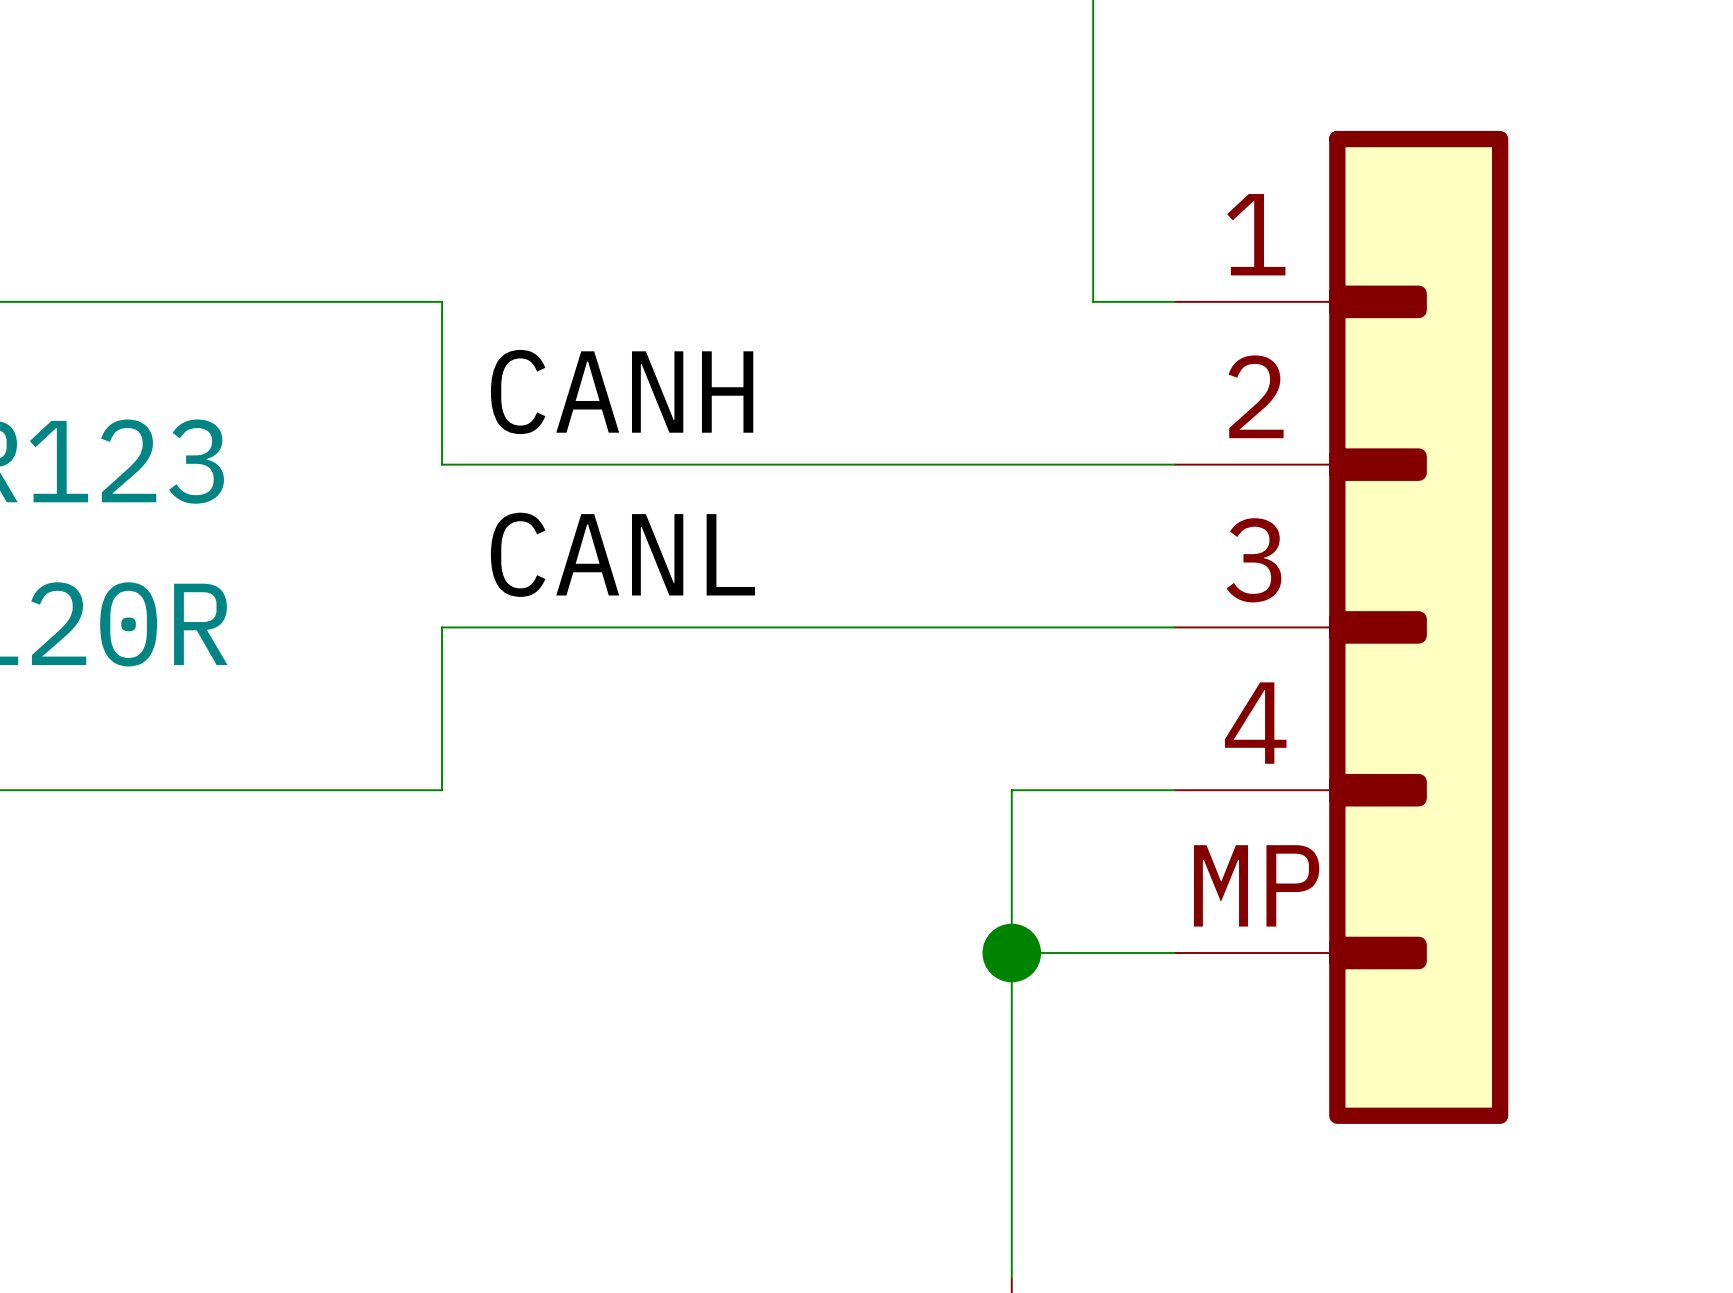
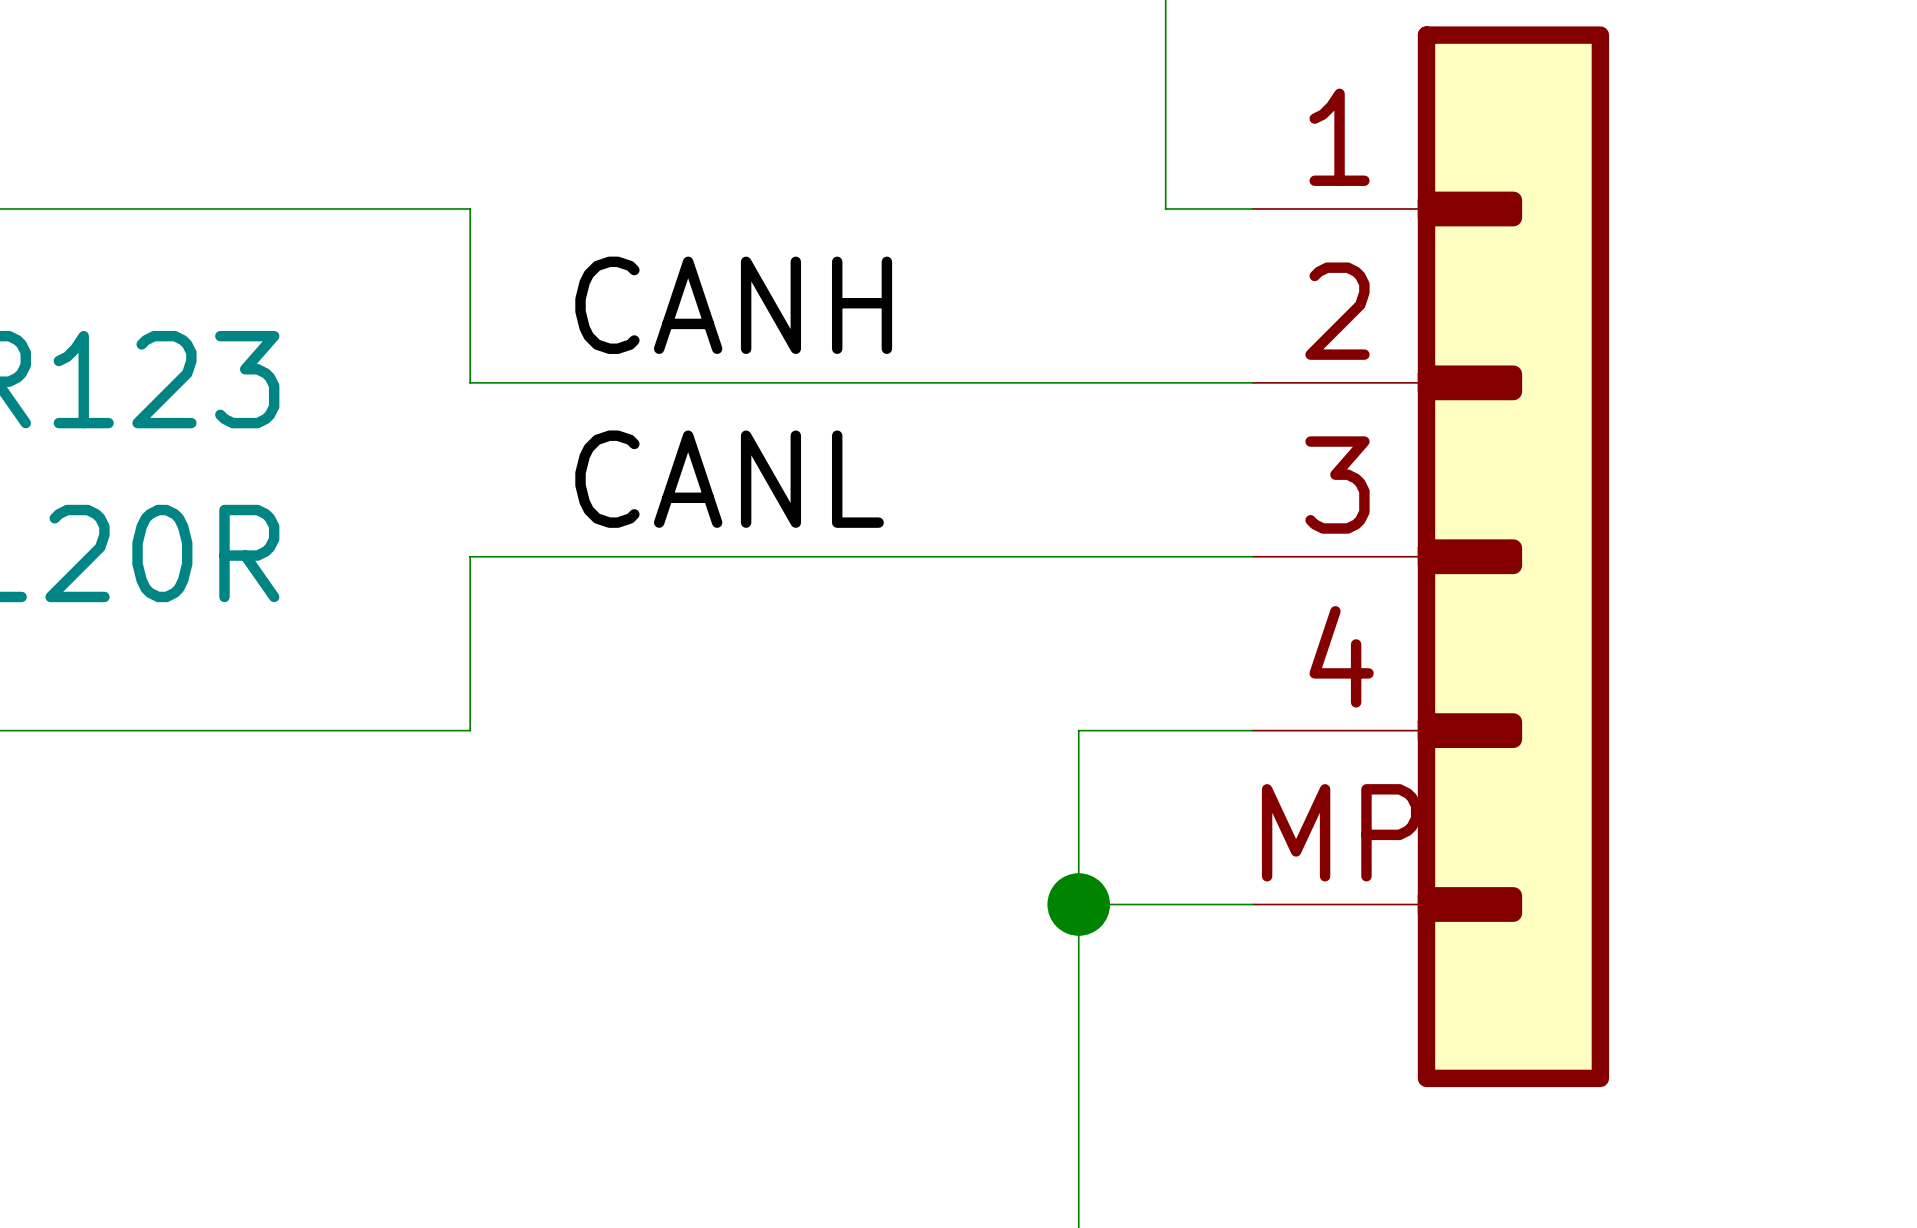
label position: CANH (622, 392) -> CANH (733, 305)
label position: CANL (622, 554) -> CANL (729, 479)

